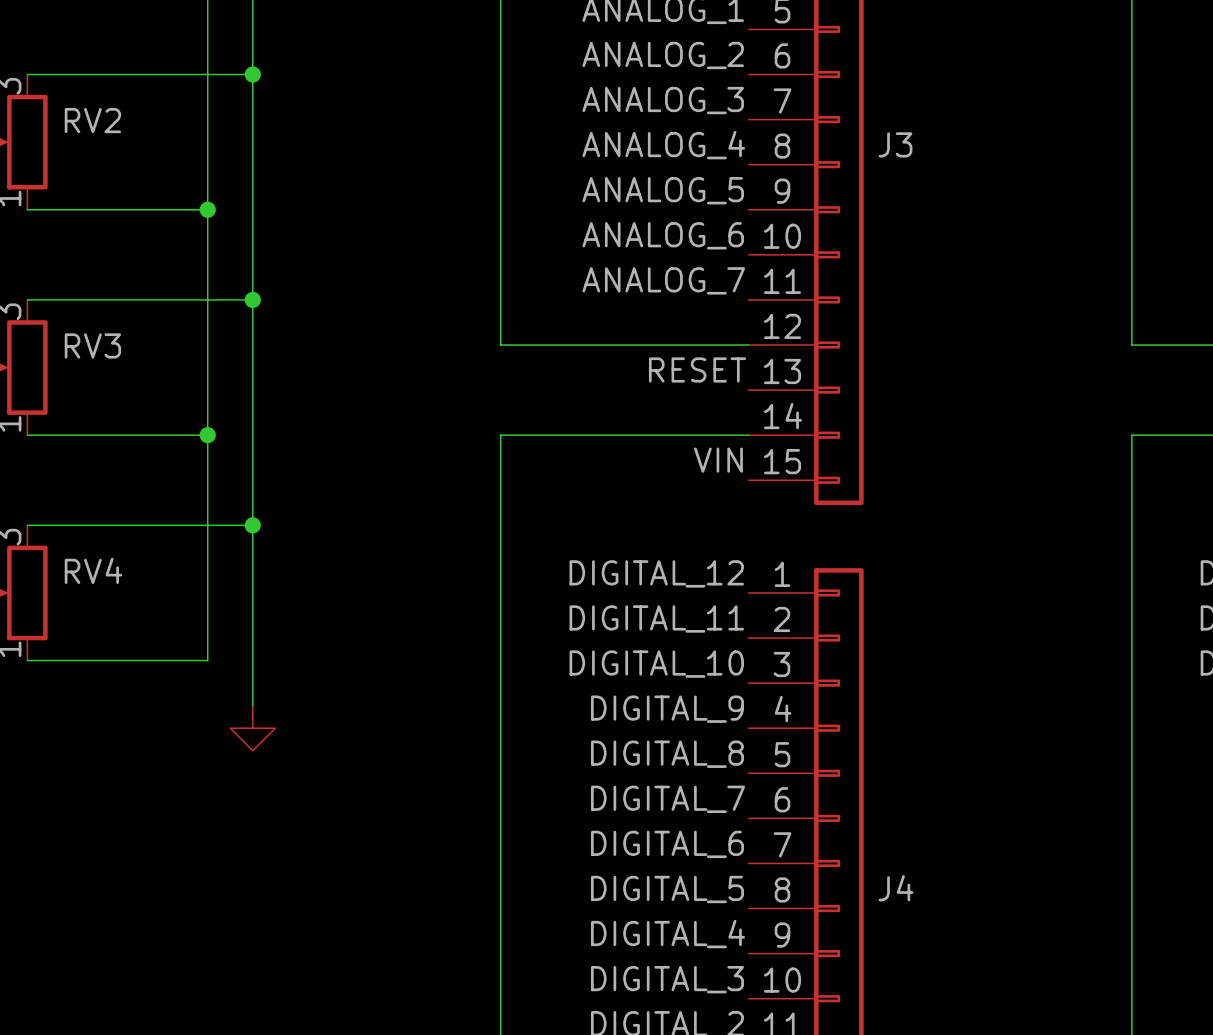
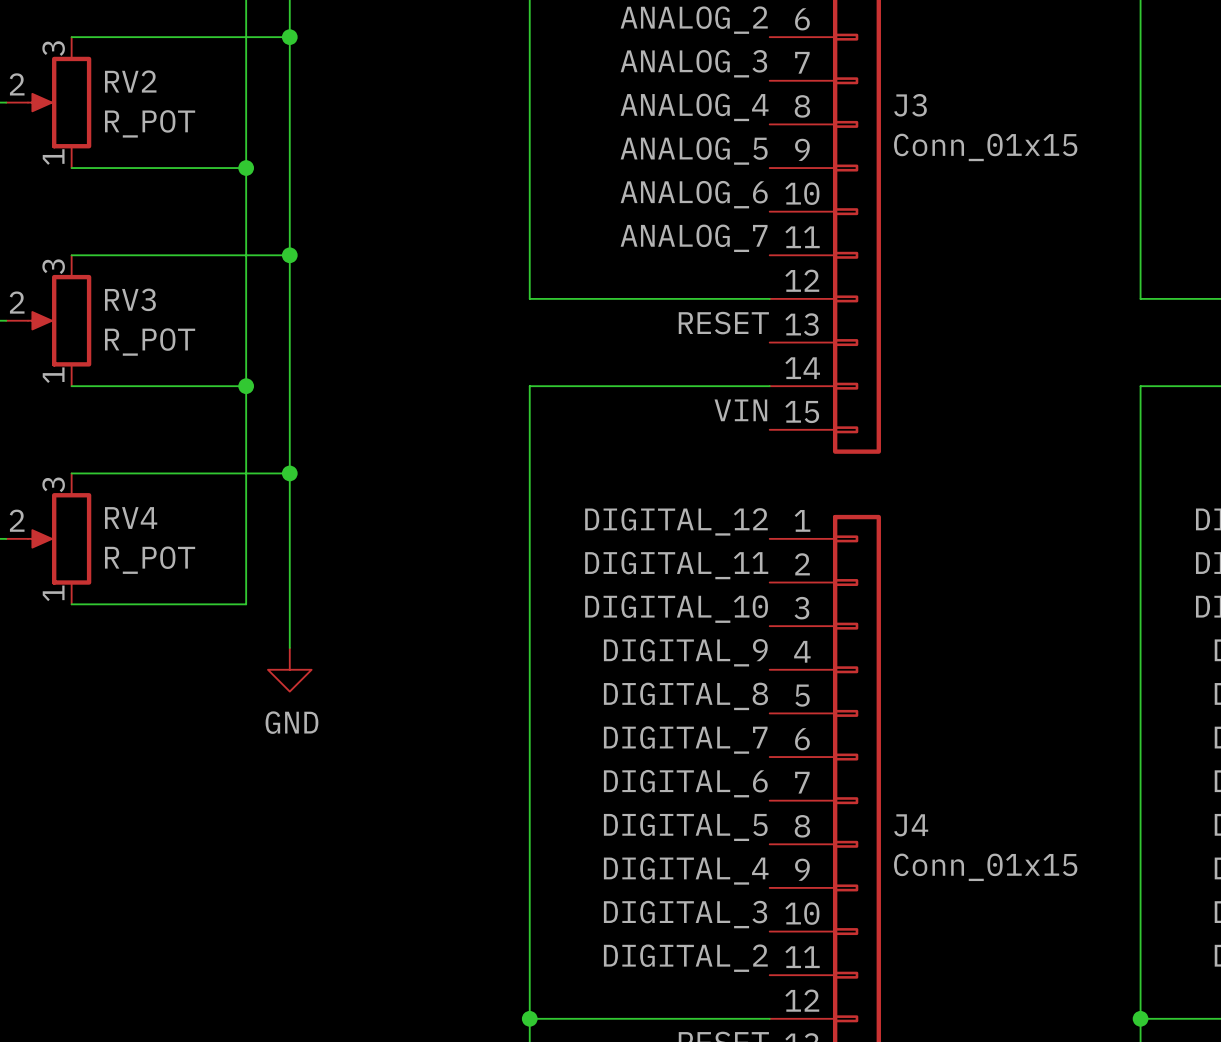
RV2 value: none -> R_POT (150, 123)
J3 value: none -> Conn_01x15 (985, 147)
RV3 value: none -> R_POT (150, 342)
RV4 value: none -> R_POT (150, 560)
power symbol text: none -> GND (291, 722)
J4 value: none -> Conn_01x15 (985, 867)

